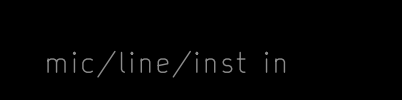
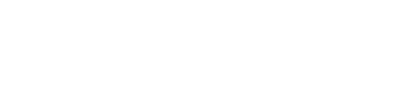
text: mic/line/inst in (166, 64) -> none

